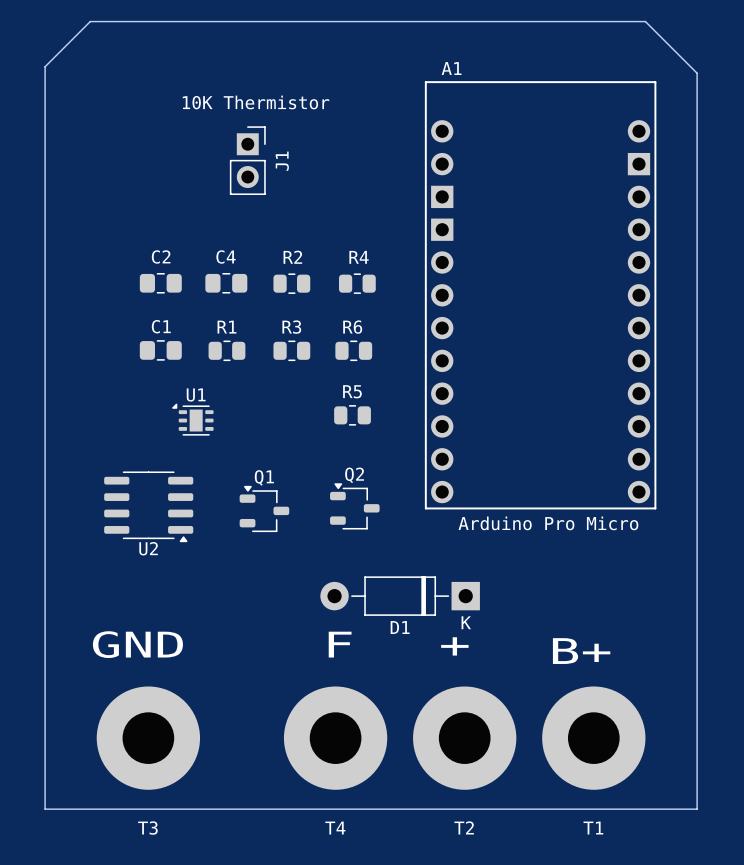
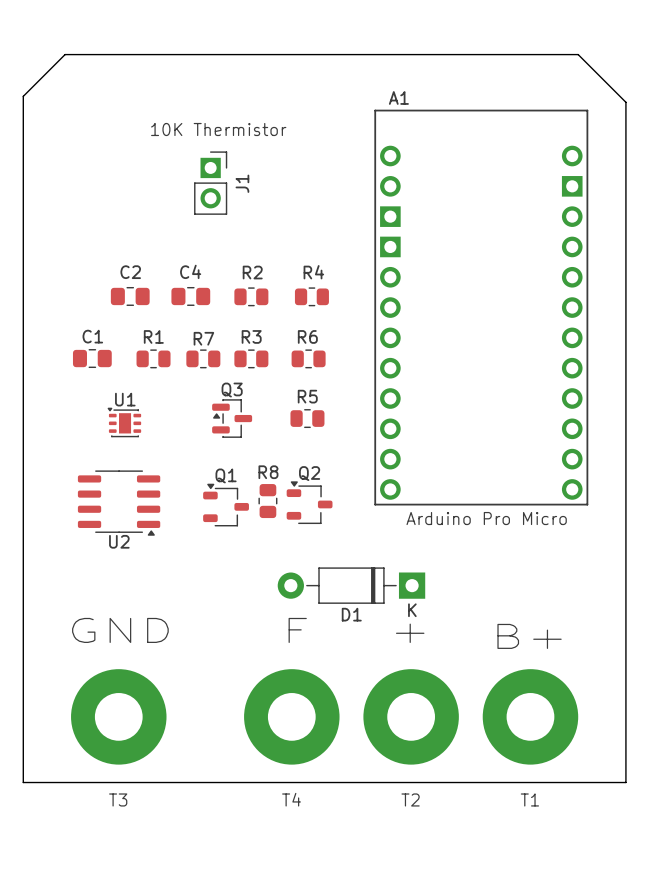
C1 position: (160, 350) -> (92, 358)
R1 position: (226, 350) -> (153, 358)
R7: none -> (203, 358)
U1 footprint: [172, 403, 214, 436] -> [107, 407, 142, 438]
Q3: none -> (232, 418)
R8: none -> (267, 501)

